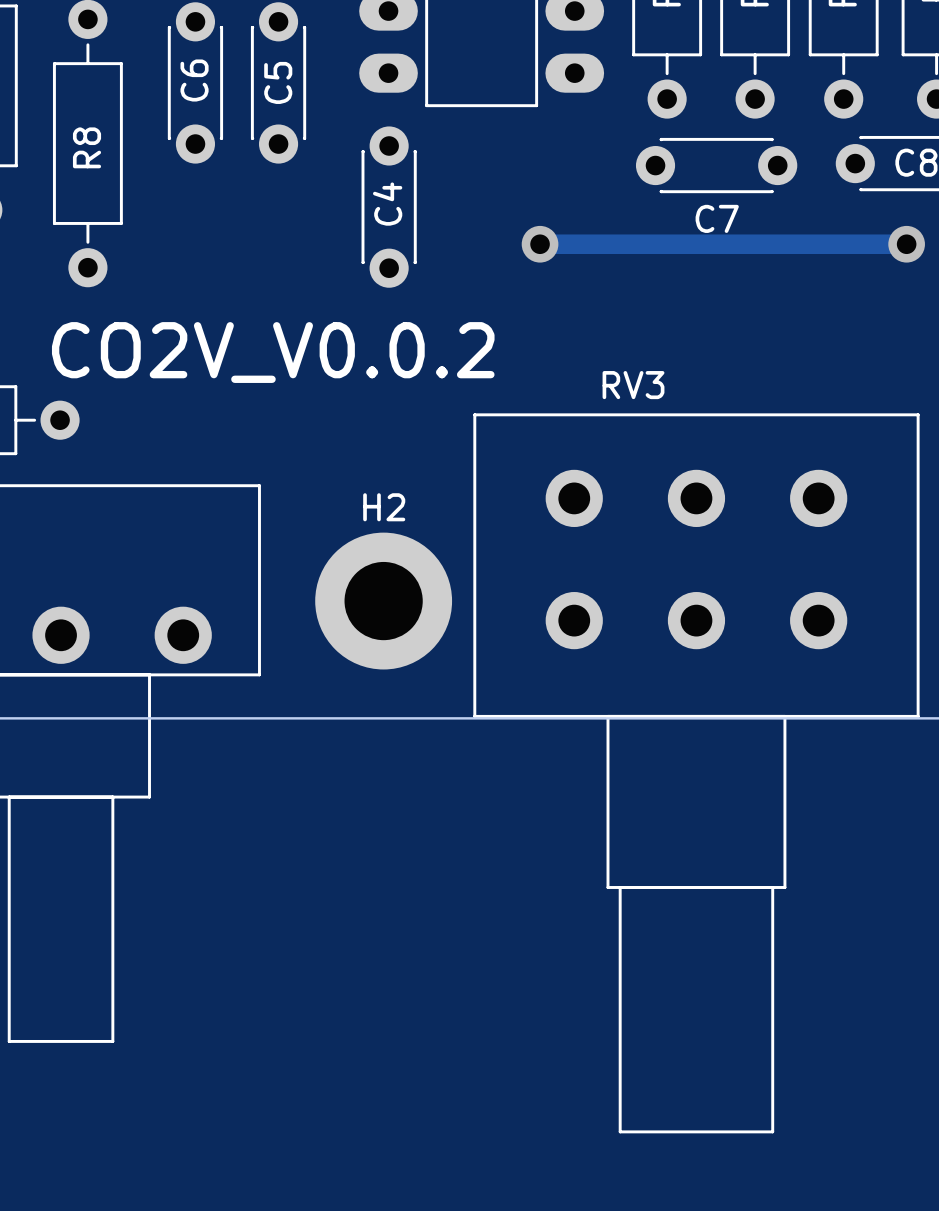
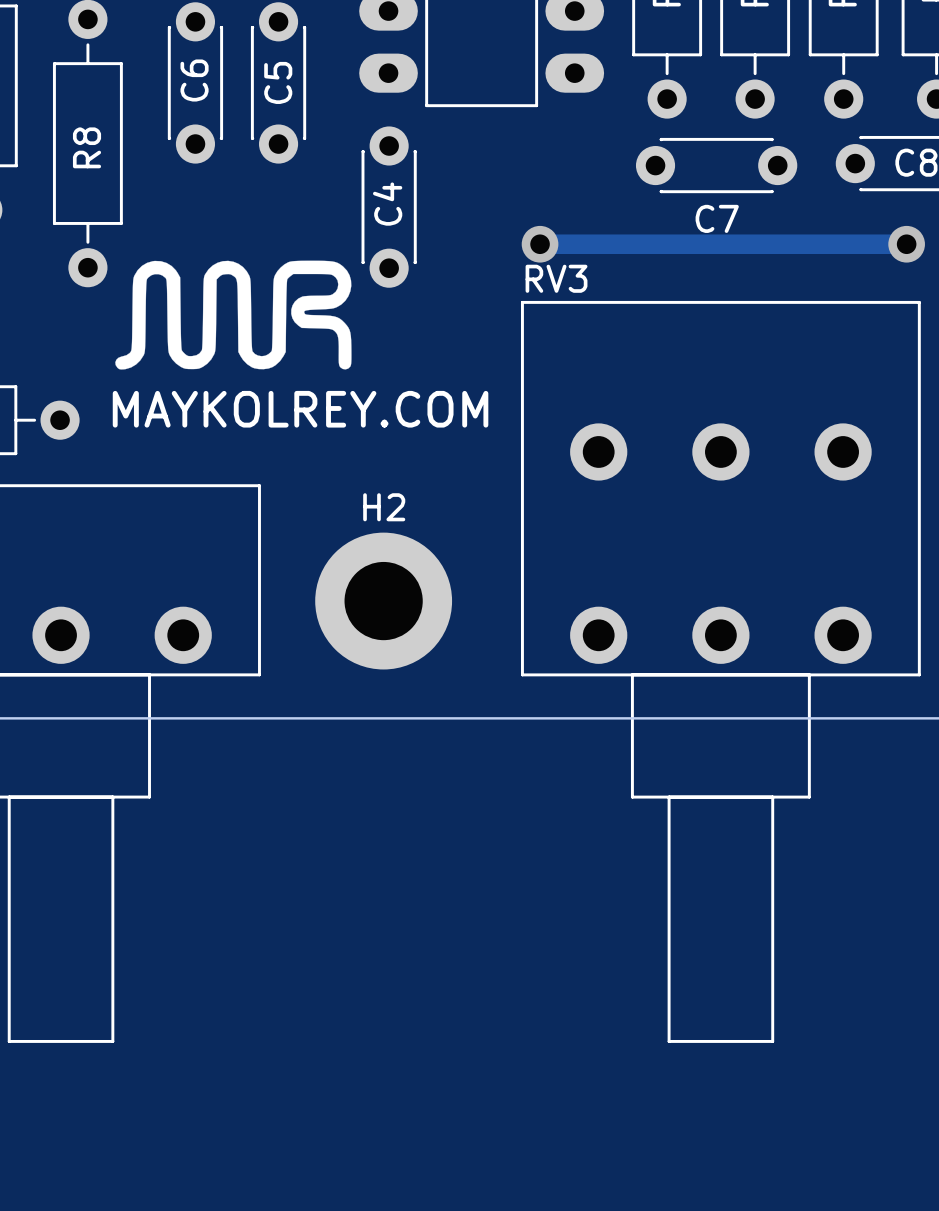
drawing: none -> [115, 260, 352, 370]
text: CO2V_V0.0.2 (273, 352) -> none
RV3 name position: RV3 (633, 385) -> RV3 (556, 278)
text: none -> MAYKOLREY.COM (300, 409)
RV3 footprint: [473, 413, 920, 1134] -> [520, 300, 921, 1043]

